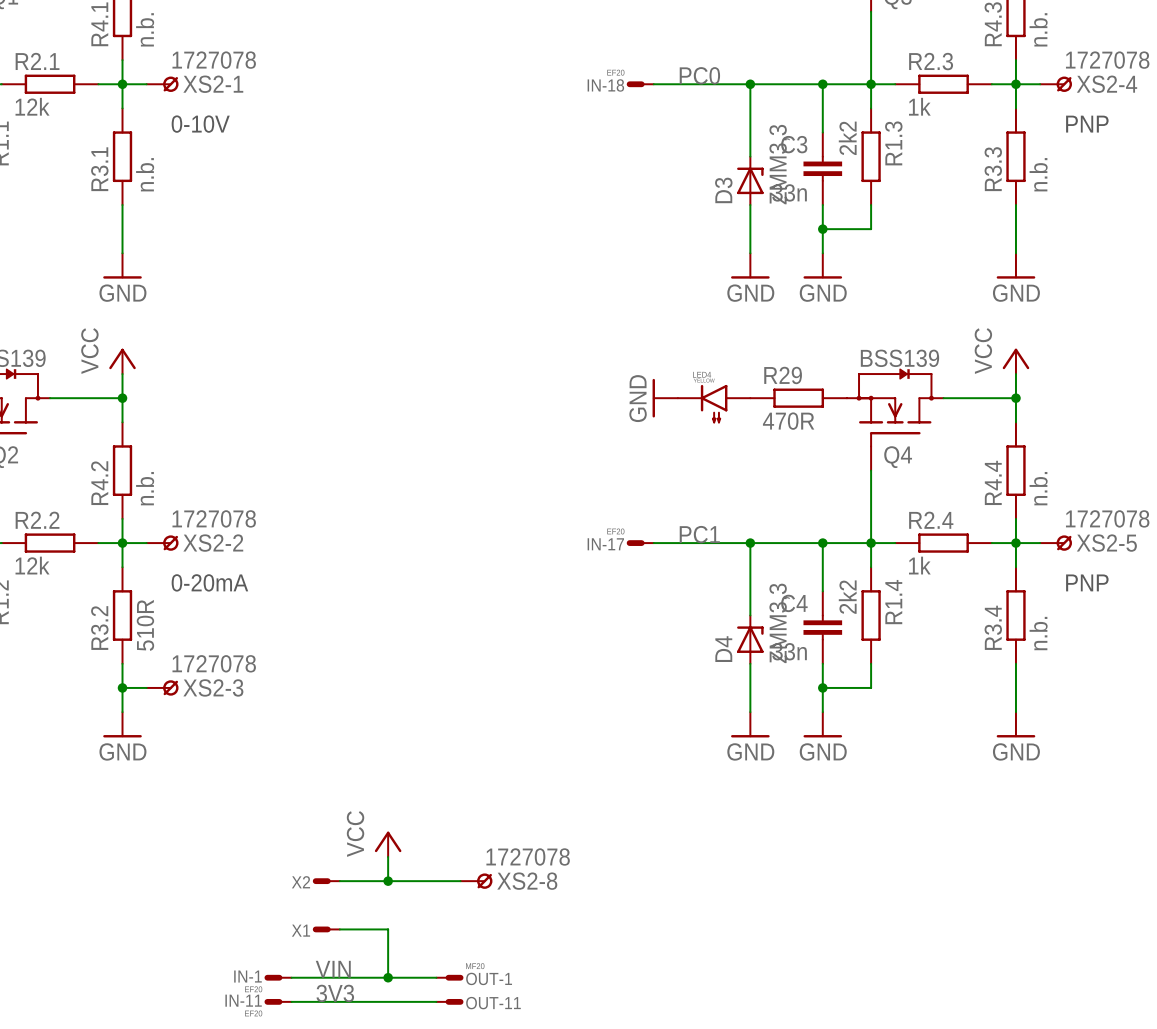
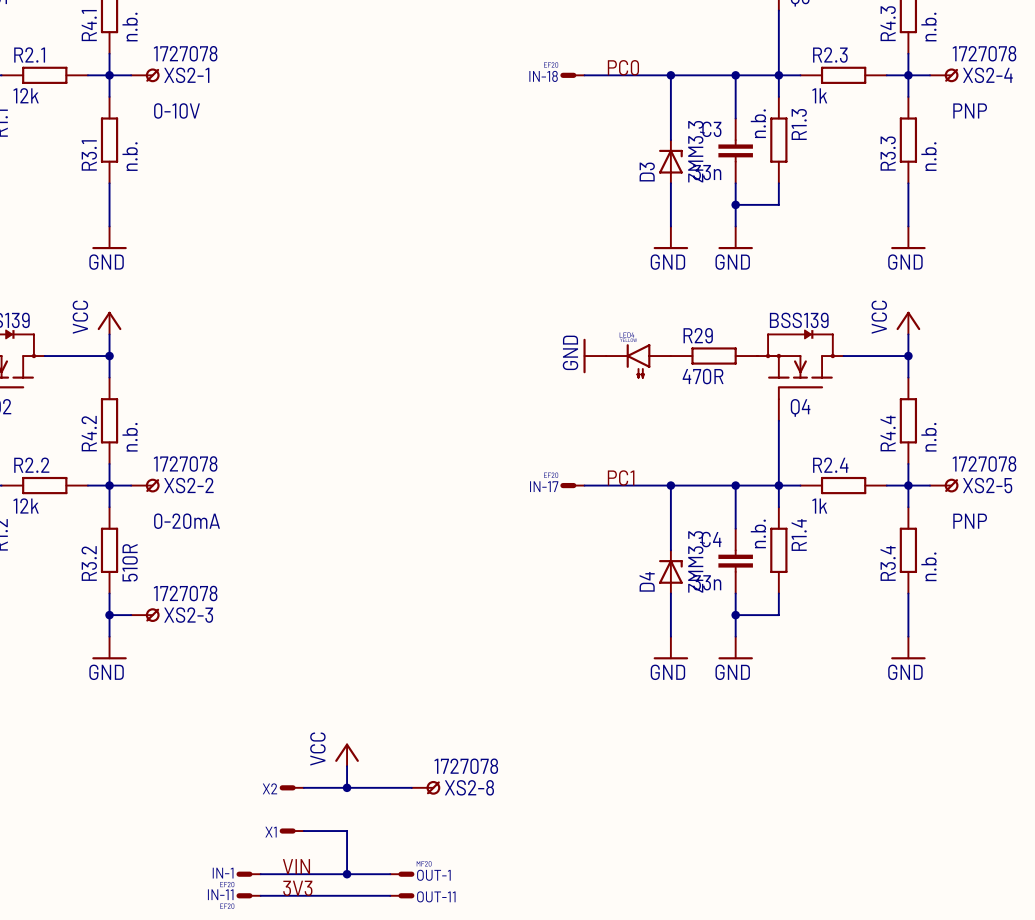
R1.3 value: 2k2 (847, 138) -> n.b. (758, 123)
R1.4 value: 2k2 (847, 597) -> n.b. (758, 533)

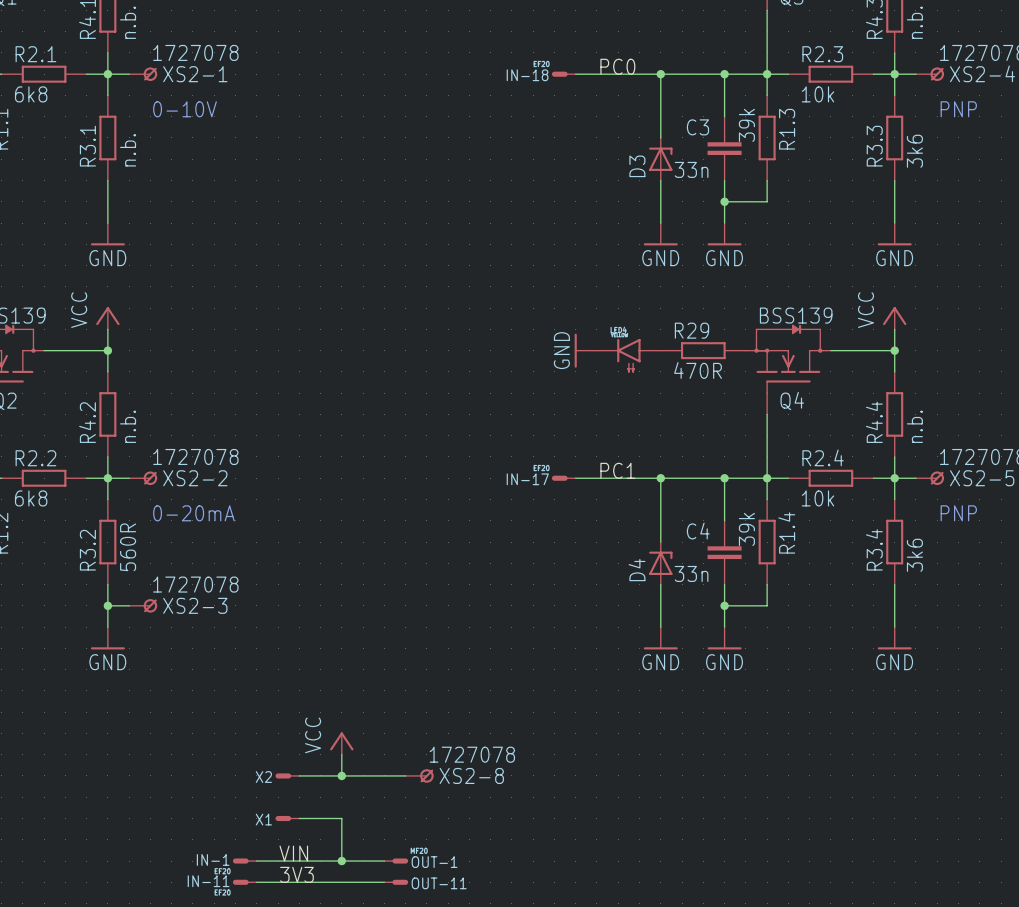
R2.1 value: 12k (26, 95) -> 6k8 (31, 94)
R2.3 value: 1k (819, 95) -> 10k (817, 94)
R1.3 value: n.b. (758, 123) -> 39k (746, 125)
D3 value: ZMM3,3 (696, 151) -> none
R3.3 value: n.b. (929, 156) -> 3k6 (914, 151)
R2.2 value: 12k (26, 505) -> 6k8 (31, 498)
R2.4 value: 1k (819, 506) -> 10k (817, 498)
R1.4 value: n.b. (758, 533) -> 39k (746, 529)
D4 value: ZMM3,3 (696, 561) -> none
R3.2 value: 510R (130, 562) -> 560R (128, 547)
R3.4 value: n.b. (929, 566) -> 3k6 (914, 555)

